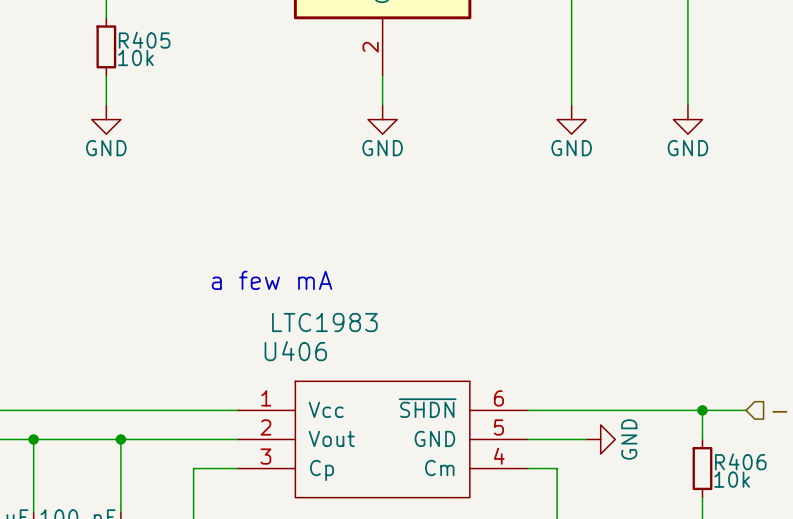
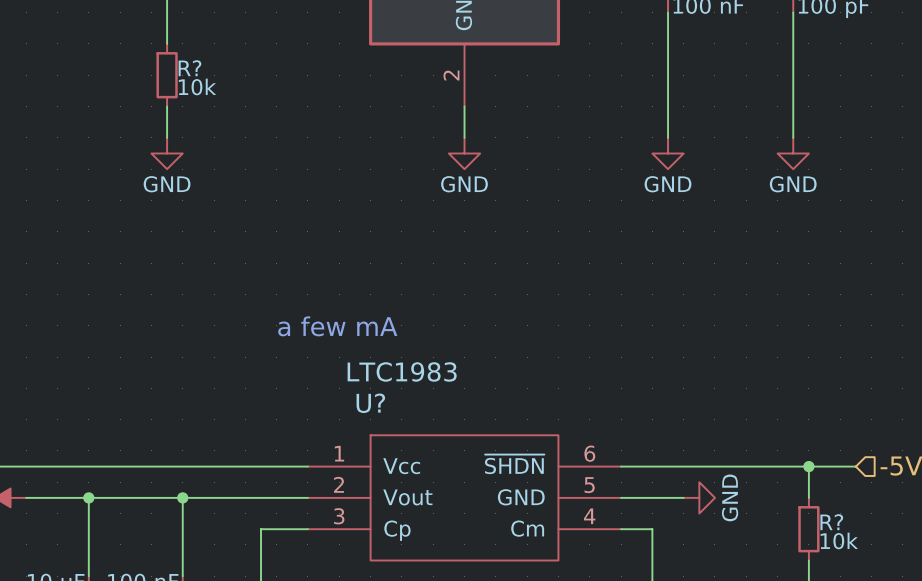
R405 name: R405 (144, 40) -> R? (189, 68)
U406 name: U406 (295, 351) -> U? (370, 403)
R406 name: R406 (740, 461) -> R? (831, 522)

